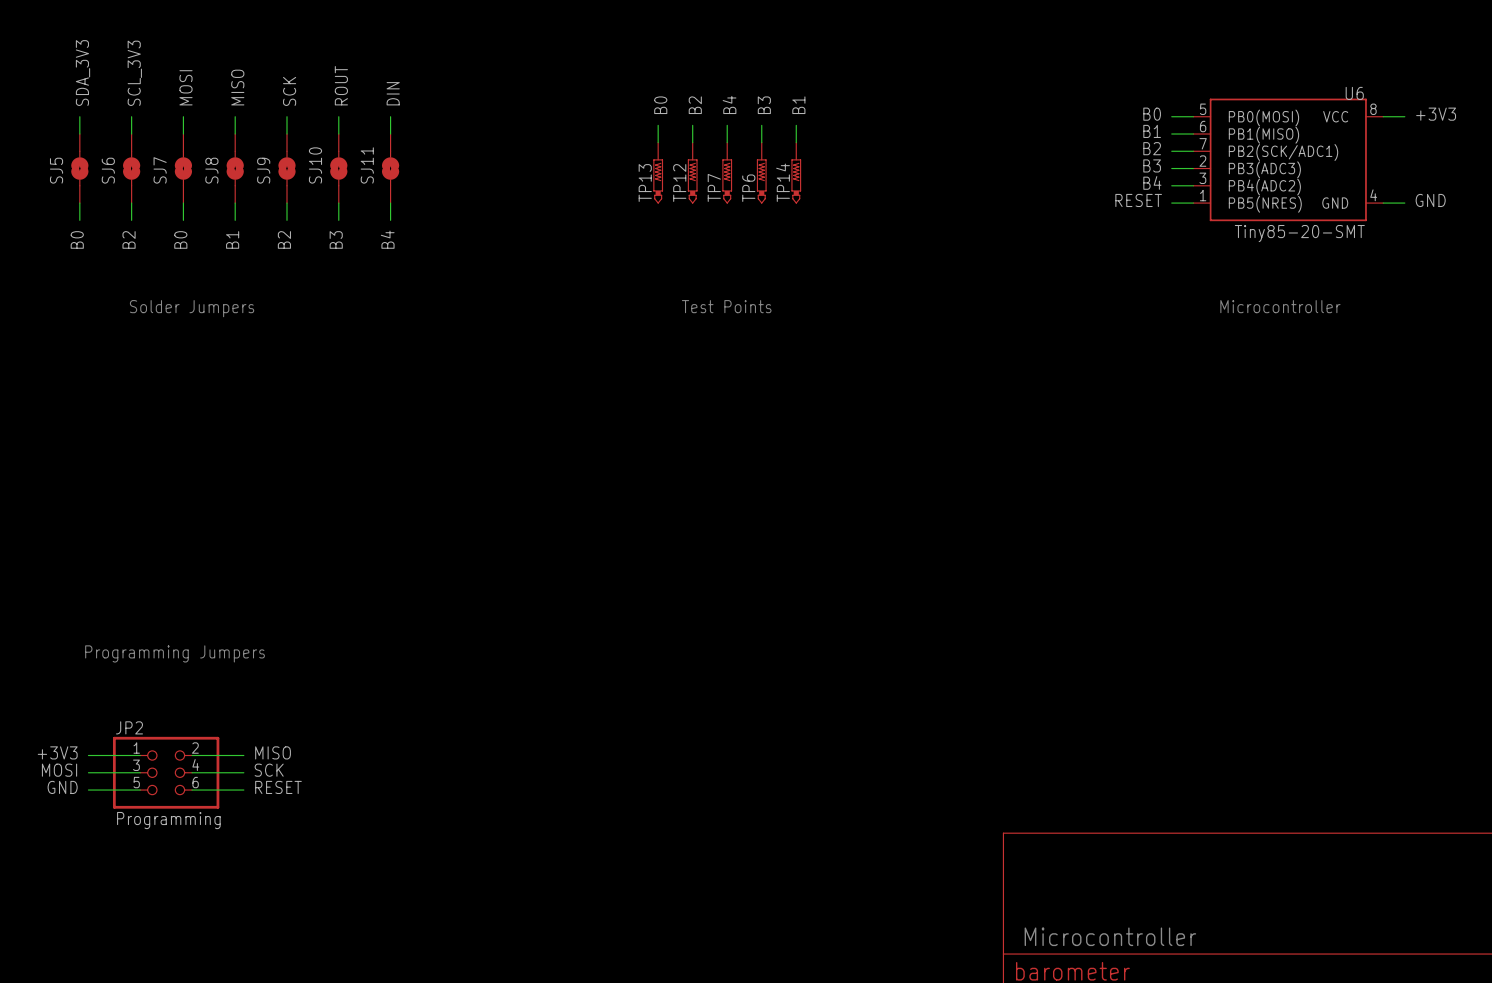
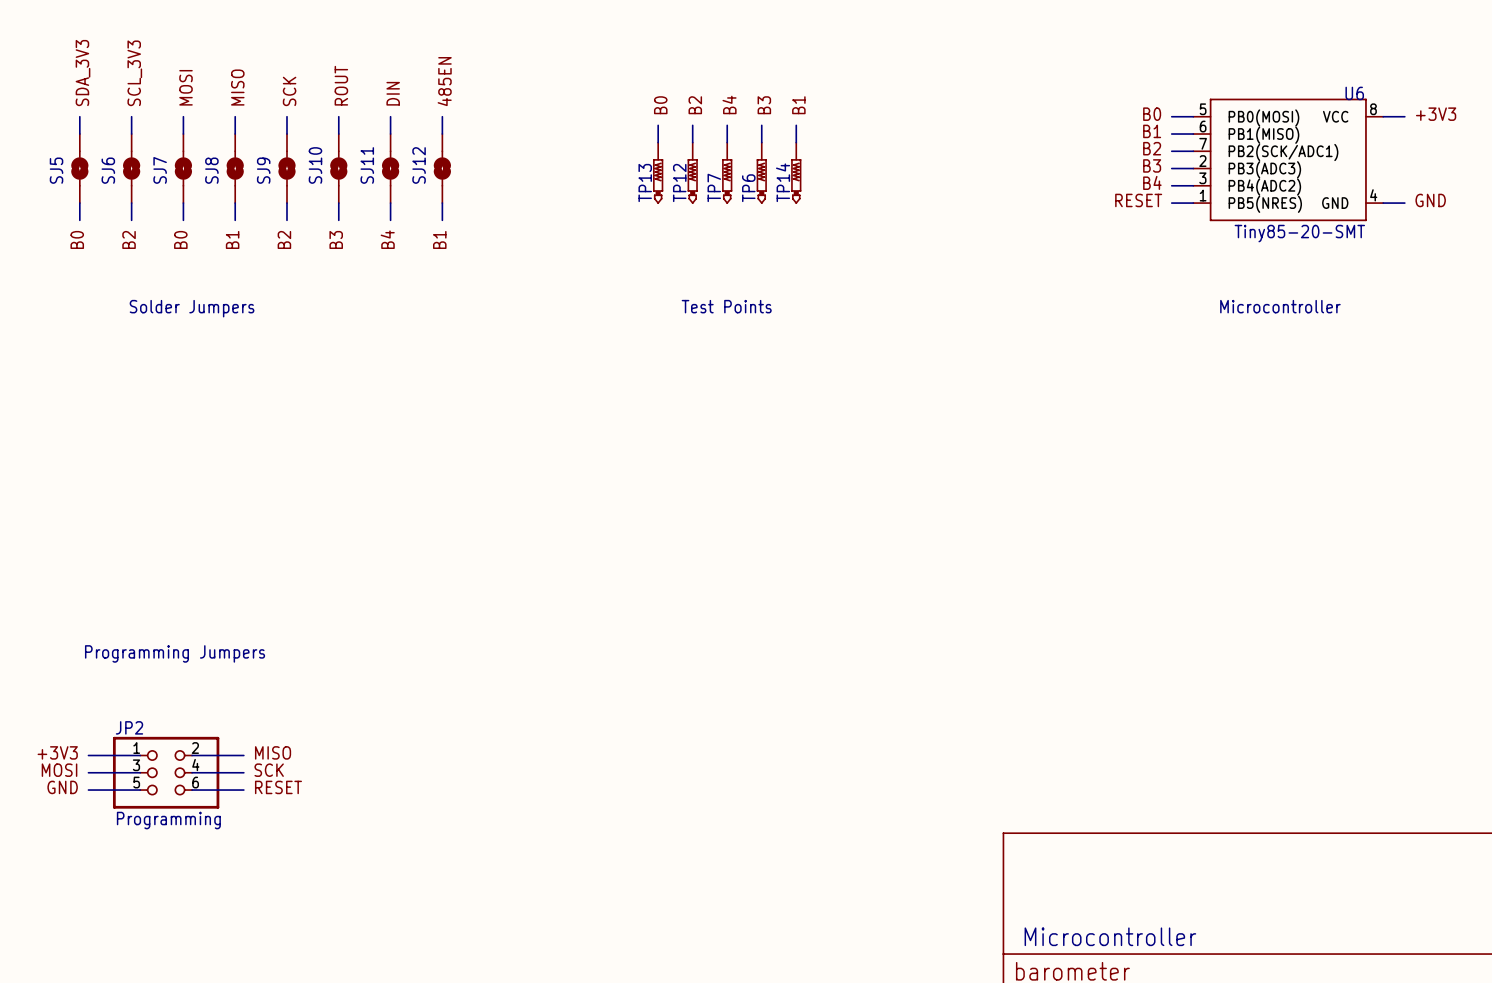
label: none -> 485EN (444, 81)
wire: none -> (442, 116) (442, 134)
SJ12: none -> (442, 168)
wire: none -> (442, 203) (442, 220)
label: none -> B1 (439, 239)

